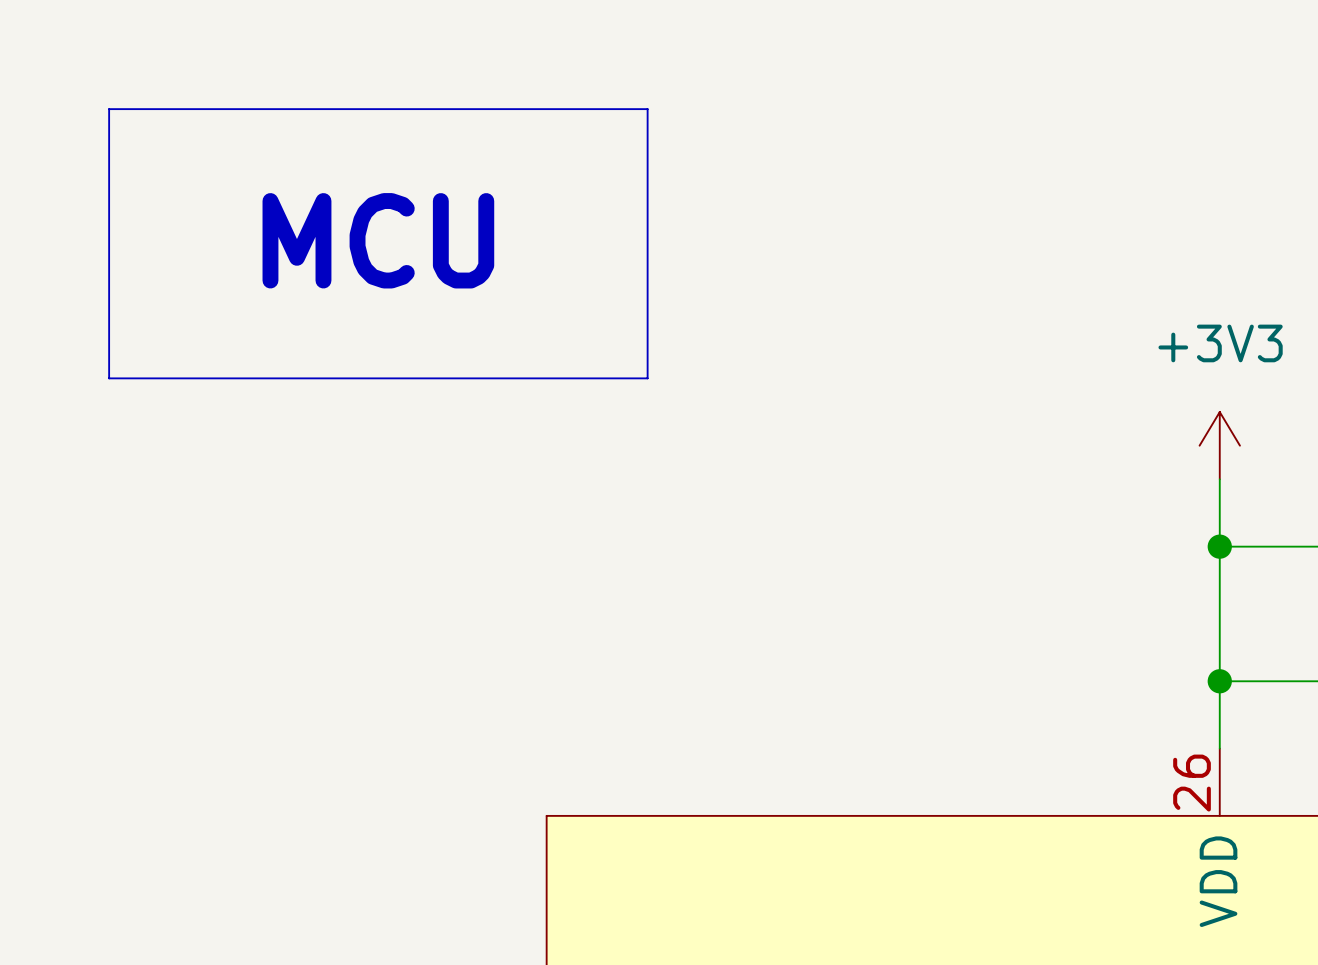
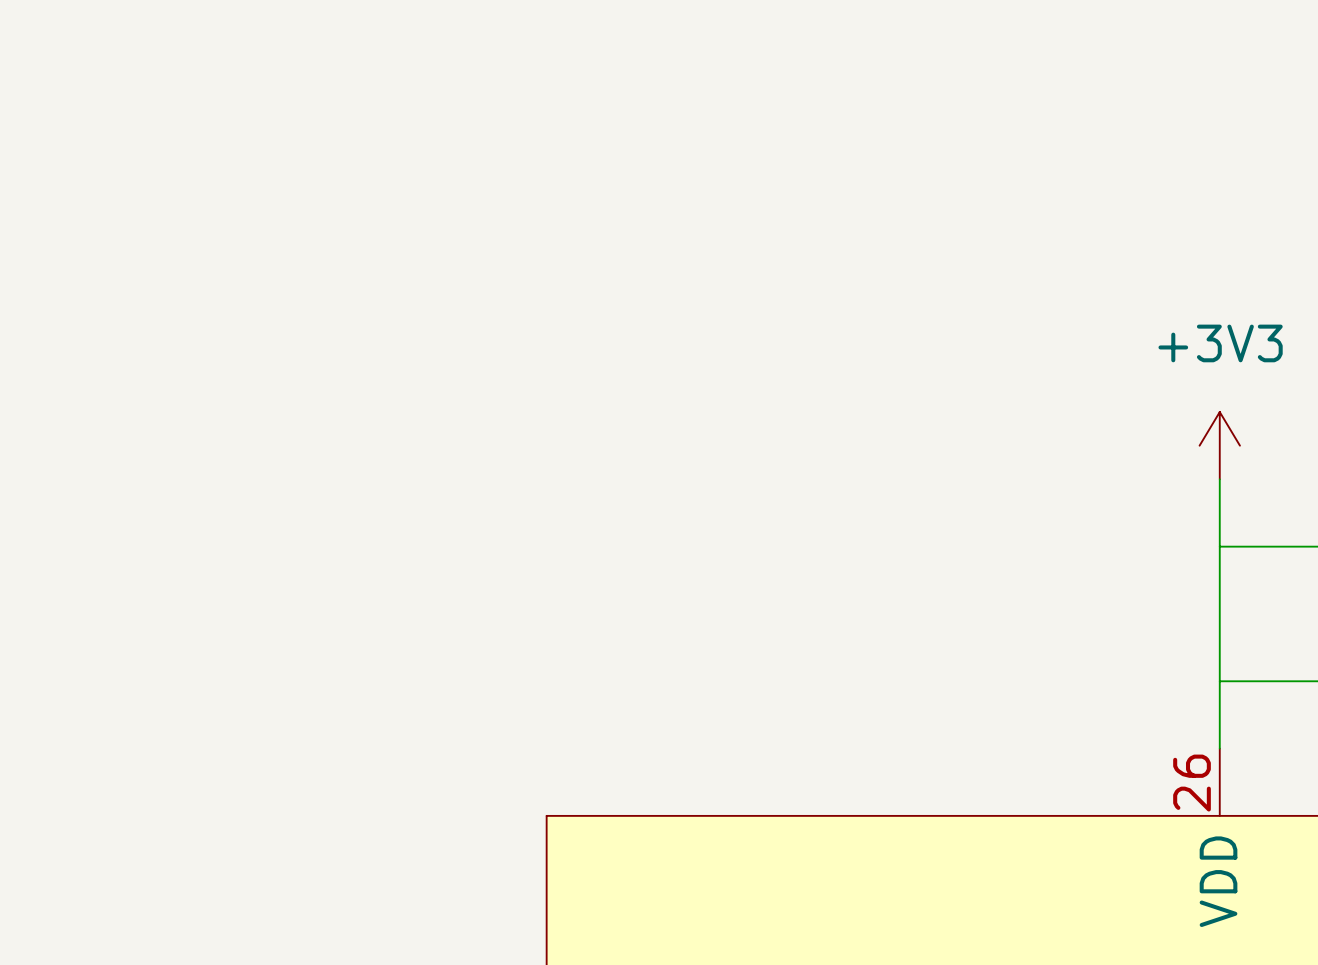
line: (109, 109) (647, 109) (647, 378) (109, 378) (109, 109) -> none
text: MCU (378, 240) -> none
junction: (1219, 546) -> none
junction: (1219, 681) -> none

